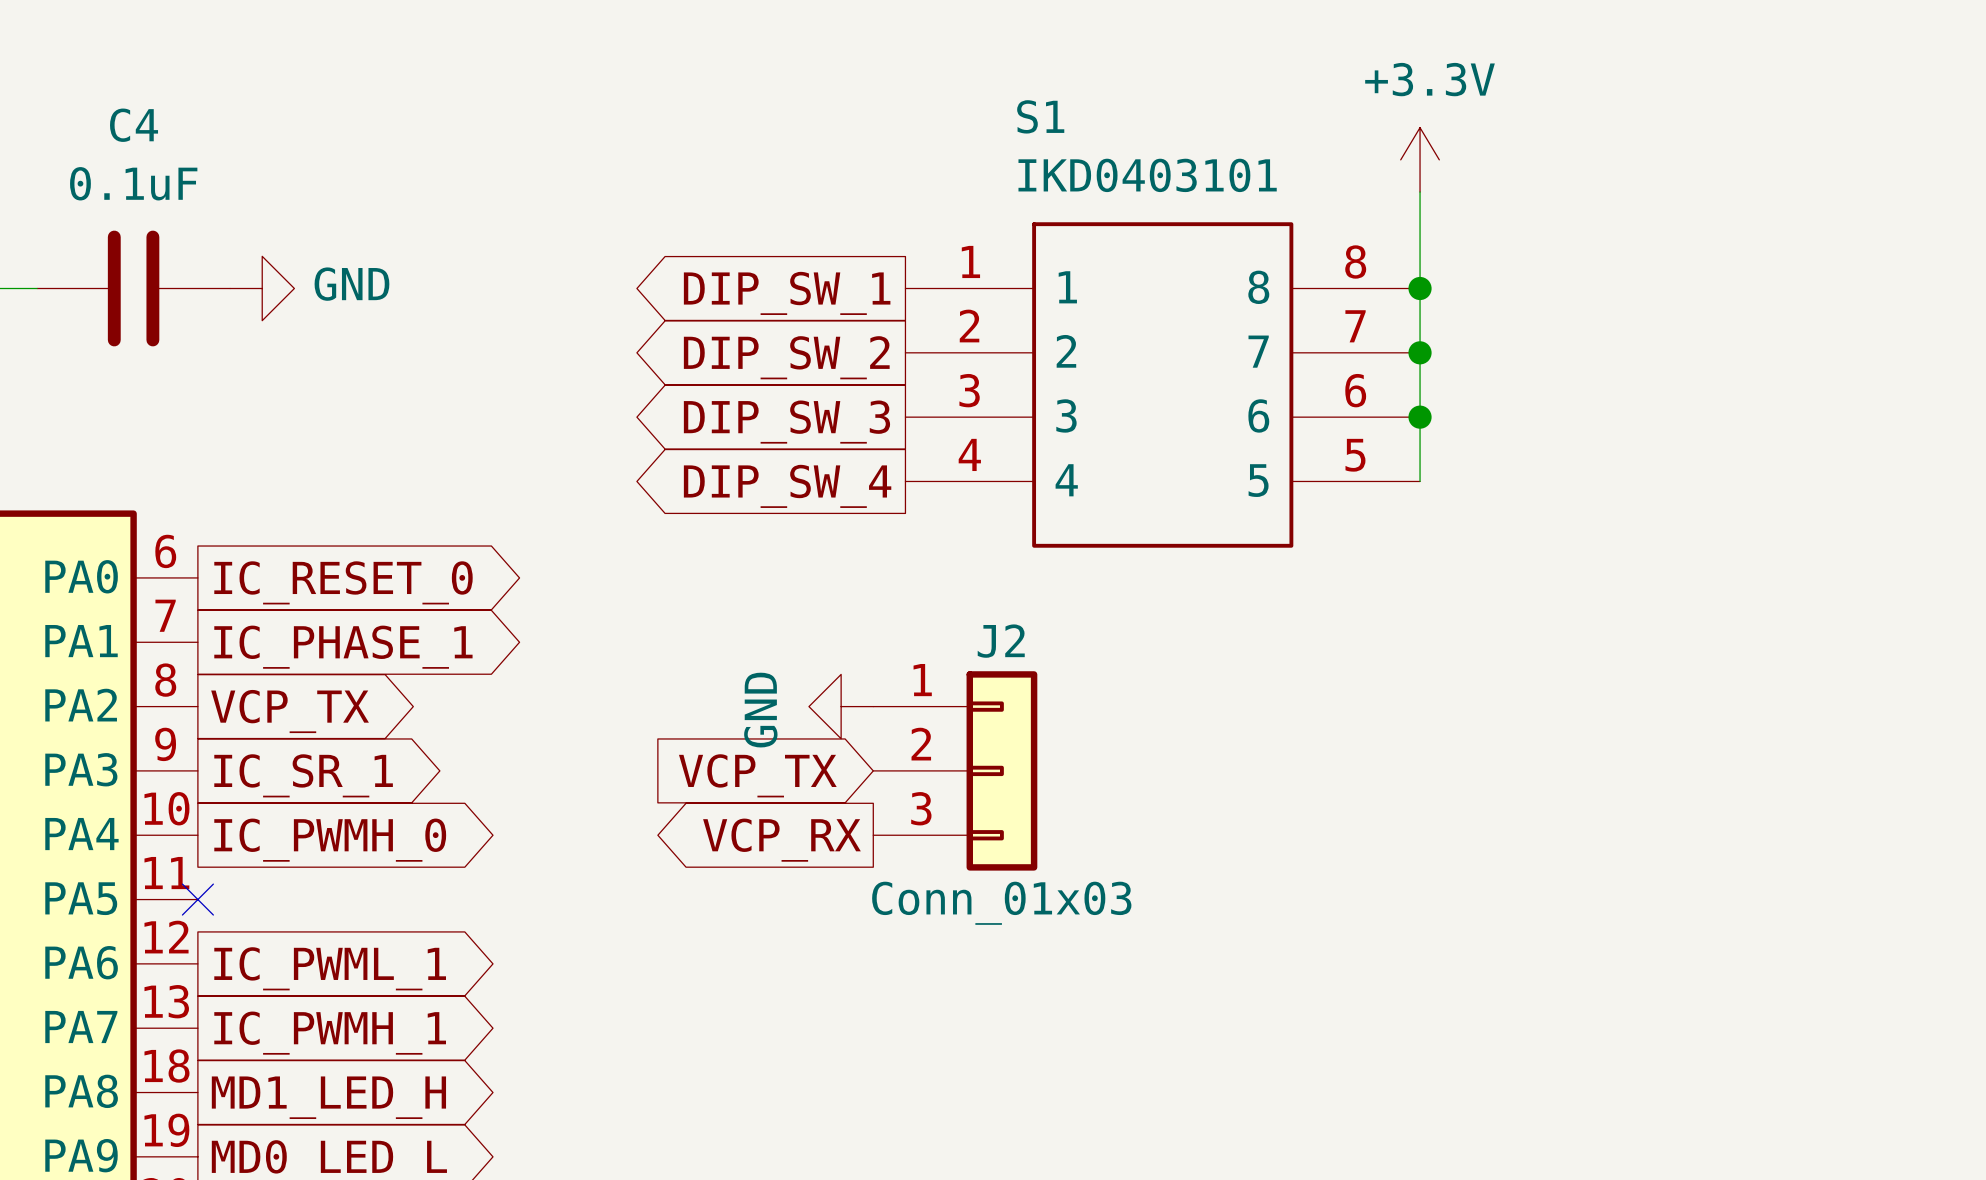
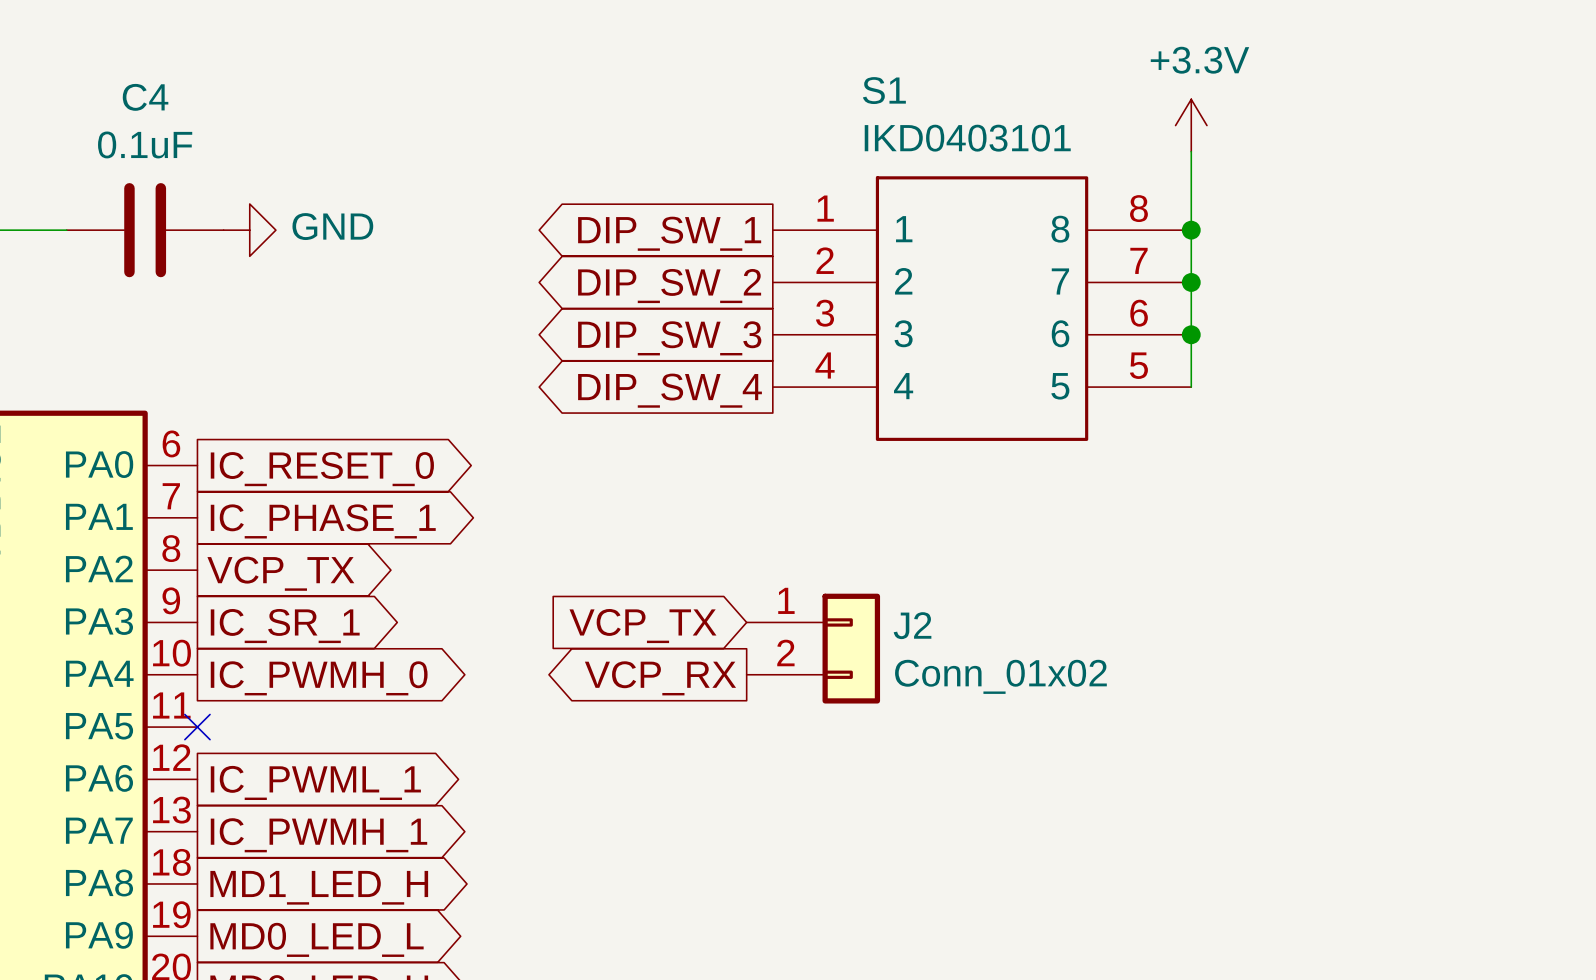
J2 name position: J2 (1001, 641) -> J2 (912, 625)
J2 symbol: [873, 671, 1038, 871] -> [746, 593, 881, 704]
power symbol: GND (841, 706) -> none
J2 value: Conn_01x03 (1001, 903) -> Conn_01x02 (1000, 676)

